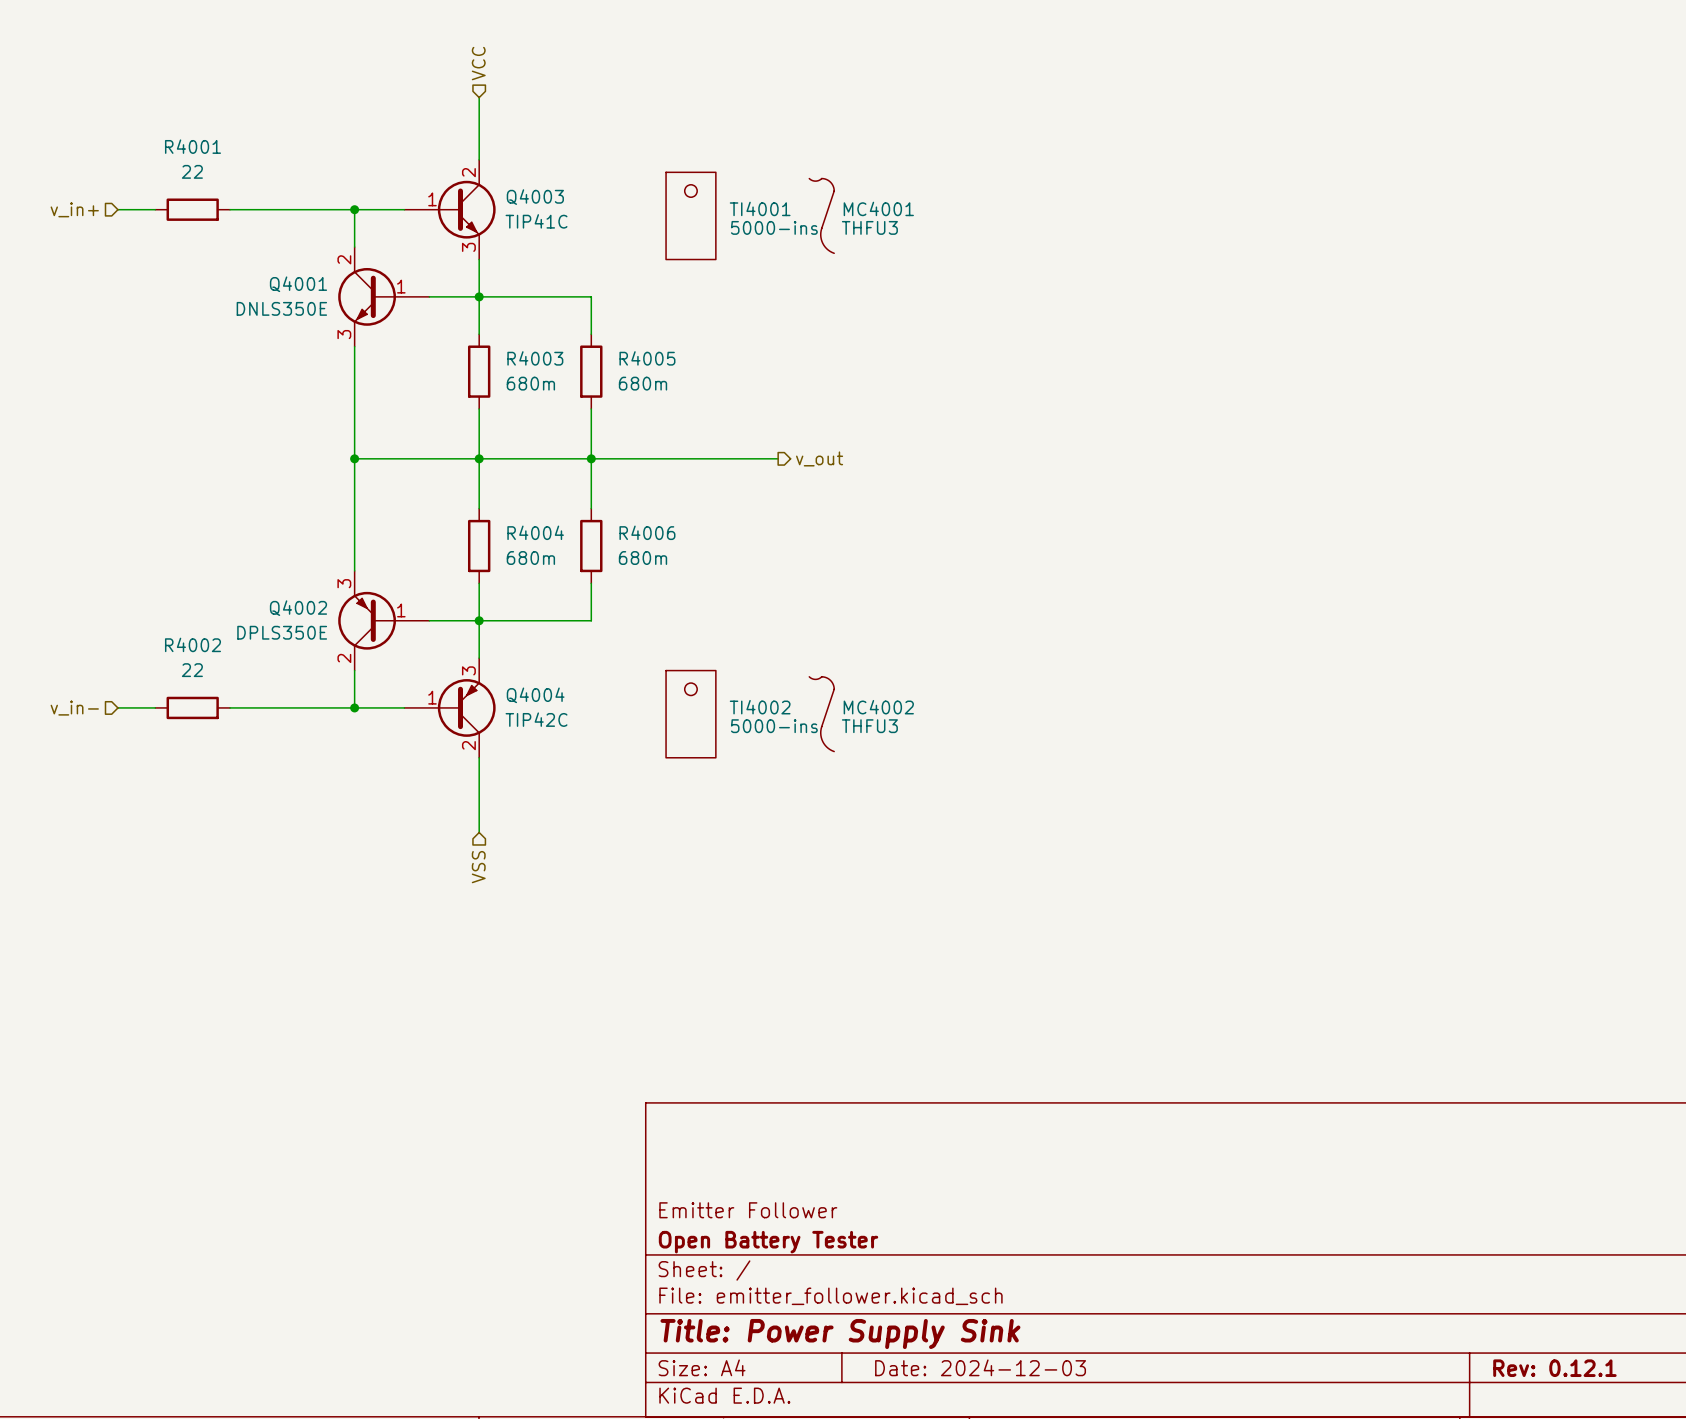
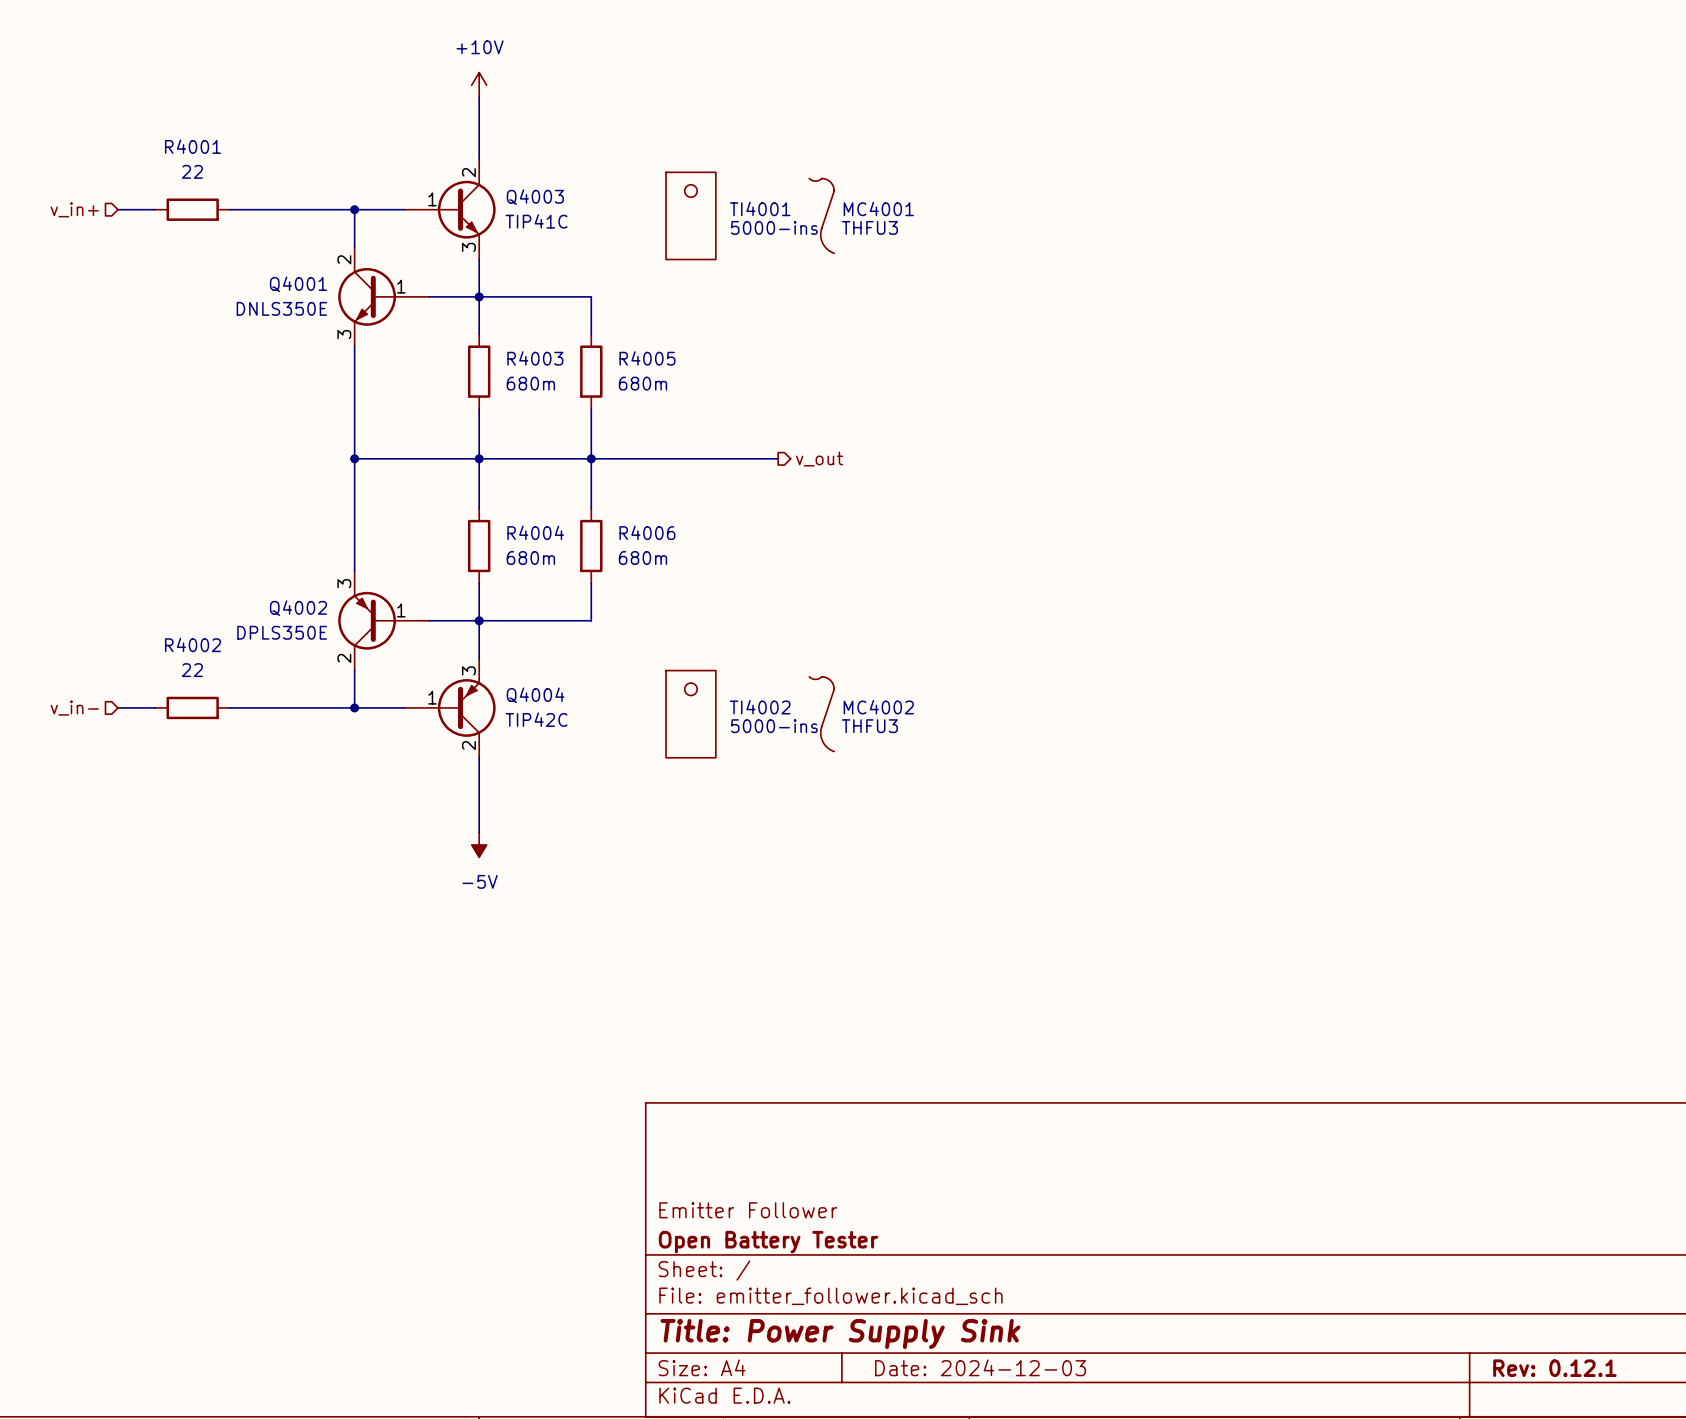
hierarchical label: VCC (478, 63) -> none
power symbol: none -> +10V (479, 85)
power symbol: none -> -5V (479, 844)
hierarchical label: VSS (478, 867) -> none

